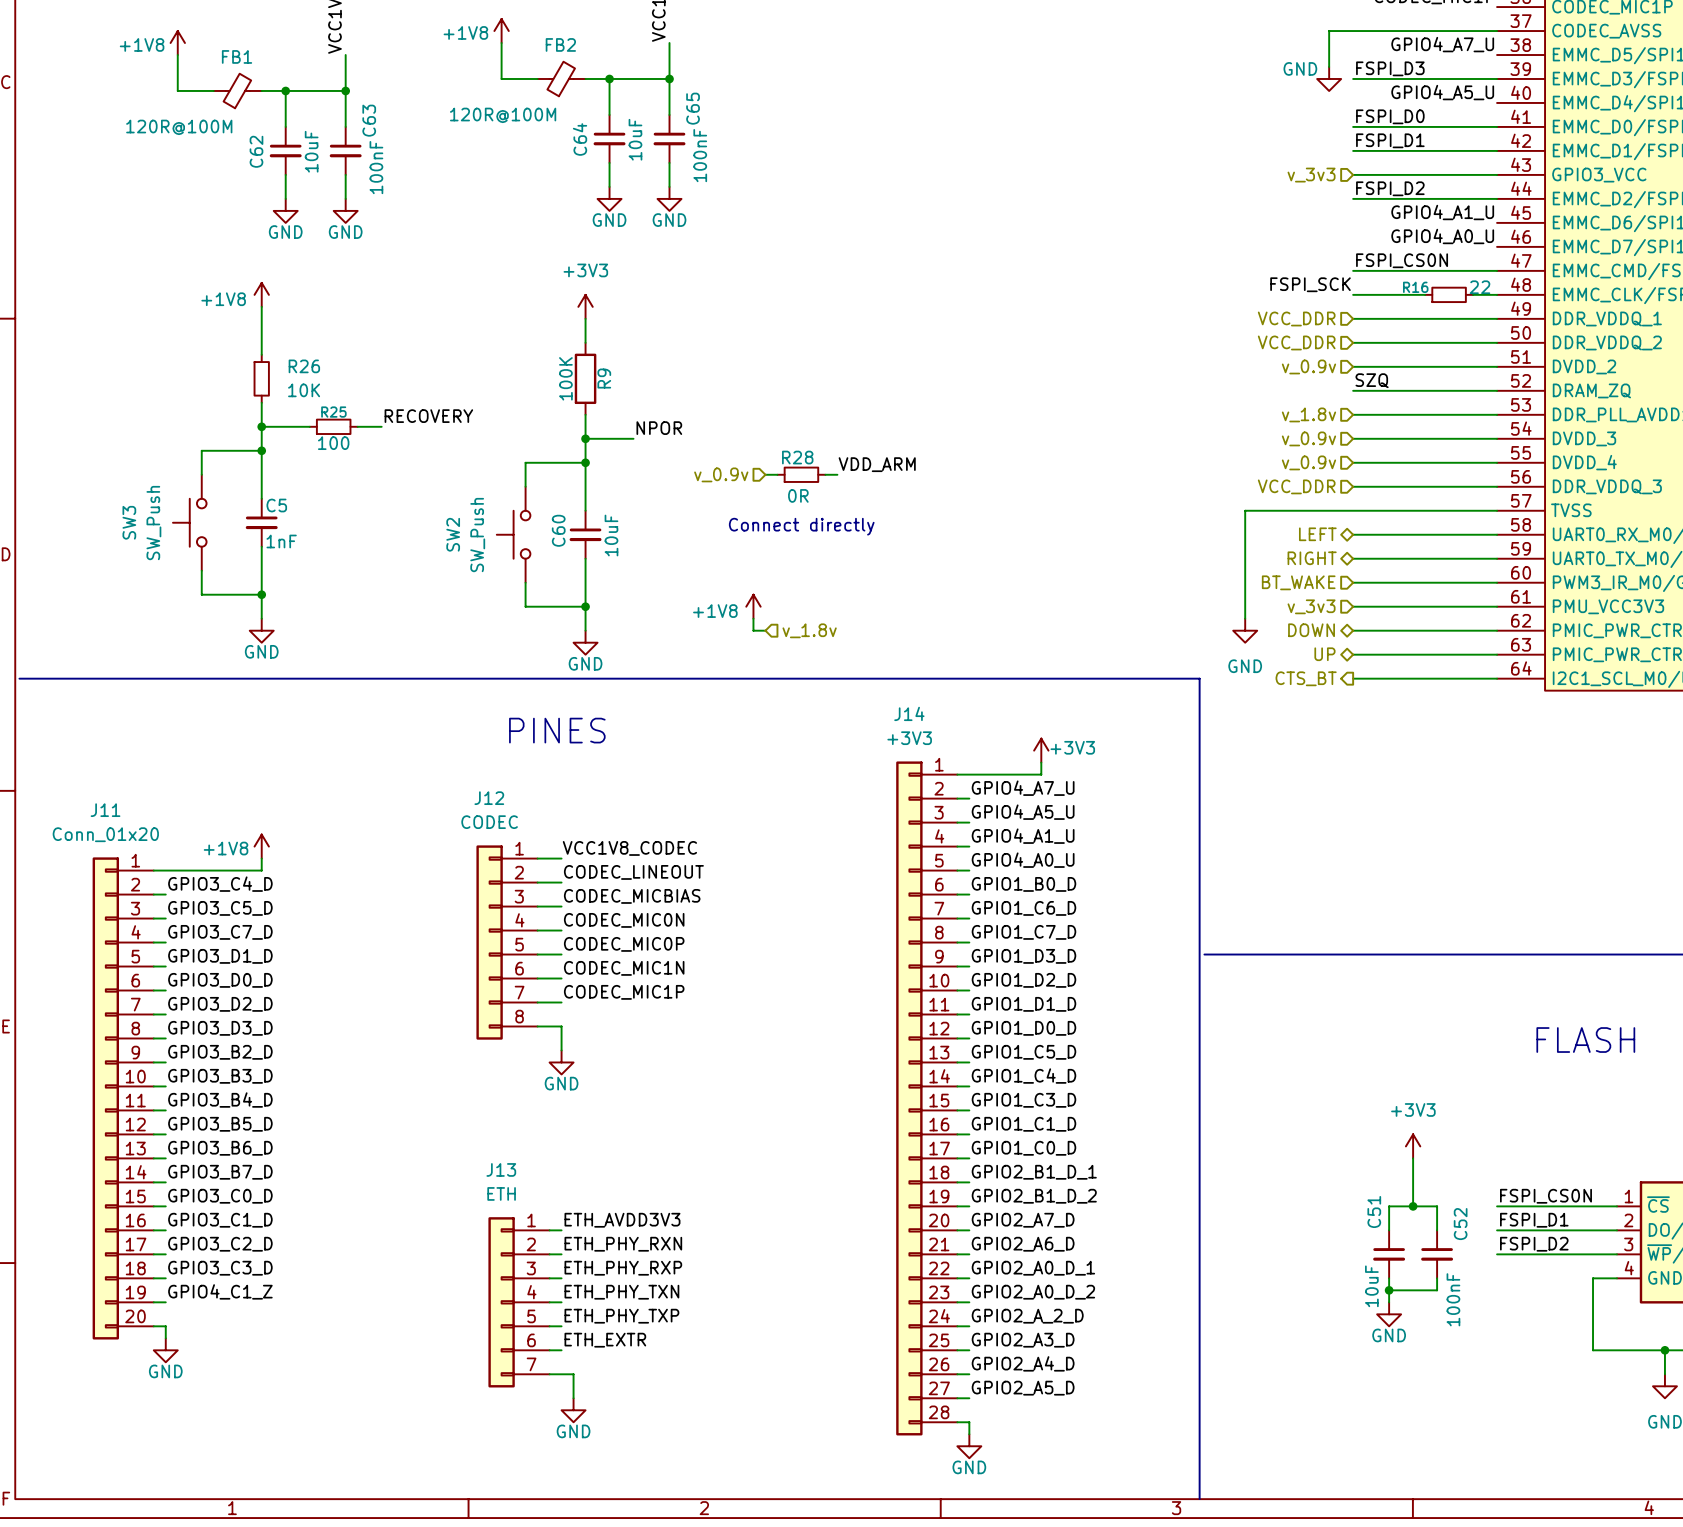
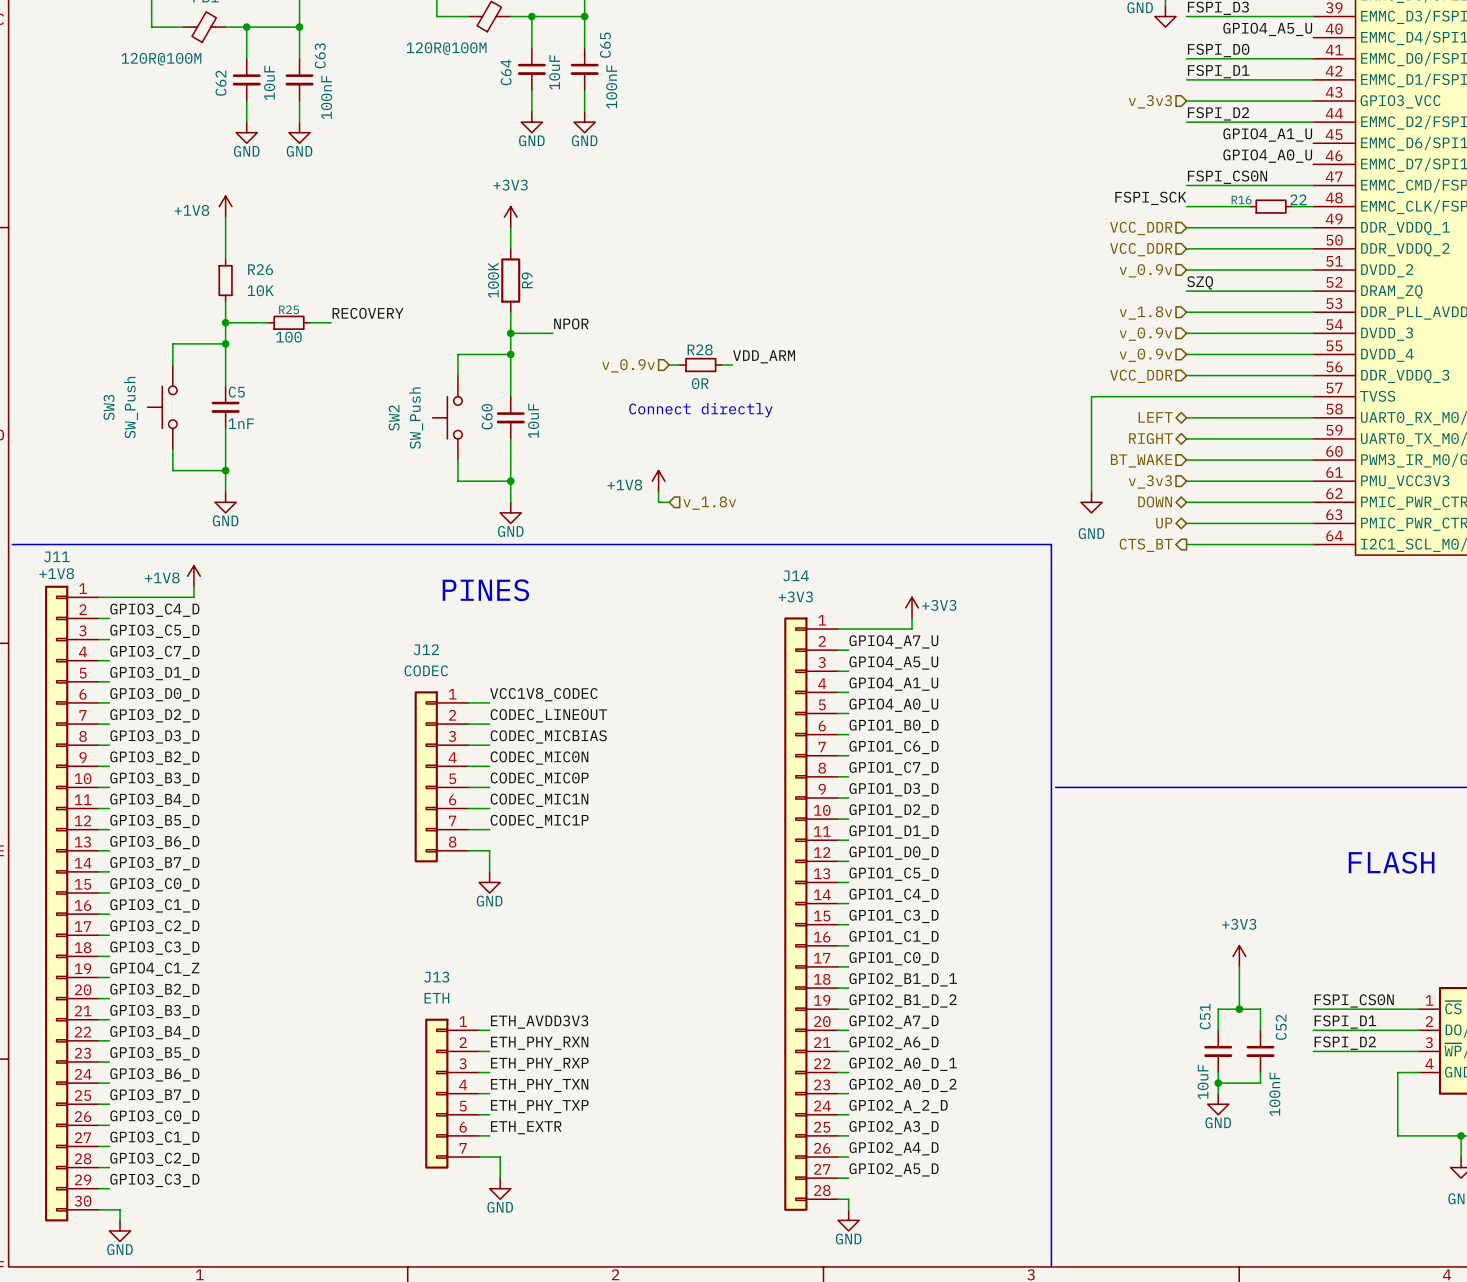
J11 name position: J11 (105, 810) -> J11 (56, 556)
J11 value: Conn_01x20 (105, 834) -> +1V8 (56, 573)
power symbol position: +1V8 (261, 846) -> +1V8 (193, 576)
J11 symbol: [92, 857, 154, 1340] -> [45, 585, 99, 1222]
wire: (261, 858) (261, 870) (153, 870) -> (193, 586) (193, 597) (98, 597)
label position: GPIO3_C4_D (220, 884) -> GPIO3_C4_D (154, 610)
wire: (153, 894) (165, 894) -> (98, 618) (109, 618)
label position: GPIO3_C5_D (220, 908) -> GPIO3_C5_D (154, 631)
wire: (153, 918) (165, 918) -> (98, 639) (109, 639)
label: none -> GPIO3_B2_D (154, 758)
label position: GPIO3_C7_D (220, 932) -> GPIO3_C7_D (154, 652)
wire: (153, 942) (165, 942) -> (98, 660) (109, 660)
label: none -> GPIO3_B3_D (154, 779)
label position: GPIO3_D1_D (220, 956) -> GPIO3_D1_D (154, 673)
wire: (153, 966) (165, 966) -> (98, 681) (109, 681)
label: none -> GPIO3_B4_D (154, 800)
label position: GPIO3_D0_D (220, 980) -> GPIO3_D0_D (154, 694)
wire: (153, 990) (165, 990) -> (98, 702) (109, 702)
label: none -> GPIO3_B5_D (154, 821)
label position: GPIO3_D2_D (220, 1004) -> GPIO3_D2_D (154, 715)
wire: (153, 1014) (165, 1014) -> (98, 724) (109, 724)
label: none -> GPIO3_B6_D (154, 842)
label position: GPIO3_D3_D (220, 1028) -> GPIO3_D3_D (154, 736)
wire: (153, 1038) (165, 1038) -> (98, 745) (109, 745)
label: none -> GPIO3_B7_D (154, 863)
label: GPIO3_B2_D (220, 1052) -> none
wire: (153, 1062) (165, 1062) -> (98, 766) (109, 766)
label: none -> GPIO3_C0_D (154, 884)
label: GPIO3_B3_D (220, 1076) -> none
wire: (153, 1086) (165, 1086) -> (98, 787) (109, 787)
label: none -> GPIO3_C1_D (154, 905)
label: GPIO3_B4_D (220, 1100) -> none
wire: (153, 1110) (165, 1110) -> (98, 808) (109, 808)
label: none -> GPIO3_C2_D (154, 927)
label: GPIO3_B5_D (220, 1124) -> none
wire: (153, 1134) (165, 1134) -> (98, 829) (109, 829)
label: none -> GPIO3_C3_D (154, 948)
label: GPIO3_B6_D (220, 1148) -> none
wire: (153, 1158) (165, 1158) -> (98, 850) (109, 850)
label: GPIO3_B7_D (220, 1172) -> none
wire: (153, 1182) (165, 1182) -> (98, 871) (109, 871)
label: none -> GPIO3_B2_D (154, 990)
wire: none -> (98, 998) (109, 998)
label: GPIO3_C0_D (220, 1196) -> none
wire: (153, 1206) (165, 1206) -> (98, 893) (109, 893)
label: none -> GPIO3_B3_D (154, 1011)
wire: none -> (98, 1019) (109, 1019)
label: GPIO3_C1_D (220, 1220) -> none
wire: (153, 1230) (165, 1230) -> (98, 914) (109, 914)
label: none -> GPIO3_B4_D (154, 1032)
wire: none -> (98, 1040) (109, 1040)
label: GPIO3_C2_D (220, 1244) -> none
wire: (153, 1254) (165, 1254) -> (98, 935) (109, 935)
label: none -> GPIO3_B5_D (154, 1053)
wire: none -> (98, 1061) (109, 1061)
label: GPIO3_C3_D (220, 1268) -> none
wire: (153, 1278) (165, 1278) -> (98, 956) (109, 956)
label: none -> GPIO3_B6_D (154, 1074)
wire: none -> (98, 1083) (109, 1083)
label position: GPIO4_C1_Z (220, 1291) -> GPIO4_C1_Z (154, 969)
wire: (153, 1302) (165, 1302) -> (98, 977) (109, 977)
label: none -> GPIO3_B7_D (154, 1095)
wire: none -> (98, 1104) (109, 1104)
wire: (153, 1326) (165, 1326) (165, 1338) -> none
label: none -> GPIO3_C0_D (154, 1117)
wire: none -> (98, 1125) (109, 1125)
power symbol position: GND (165, 1350) -> GND (120, 1230)
label: none -> GPIO3_C1_D (154, 1138)
wire: none -> (98, 1146) (109, 1146)
label: none -> GPIO3_C2_D (154, 1159)
wire: none -> (98, 1167) (109, 1167)
label: none -> GPIO3_C3_D (154, 1180)
wire: none -> (98, 1188) (109, 1188)
wire: none -> (98, 1209) (120, 1209) (120, 1220)

